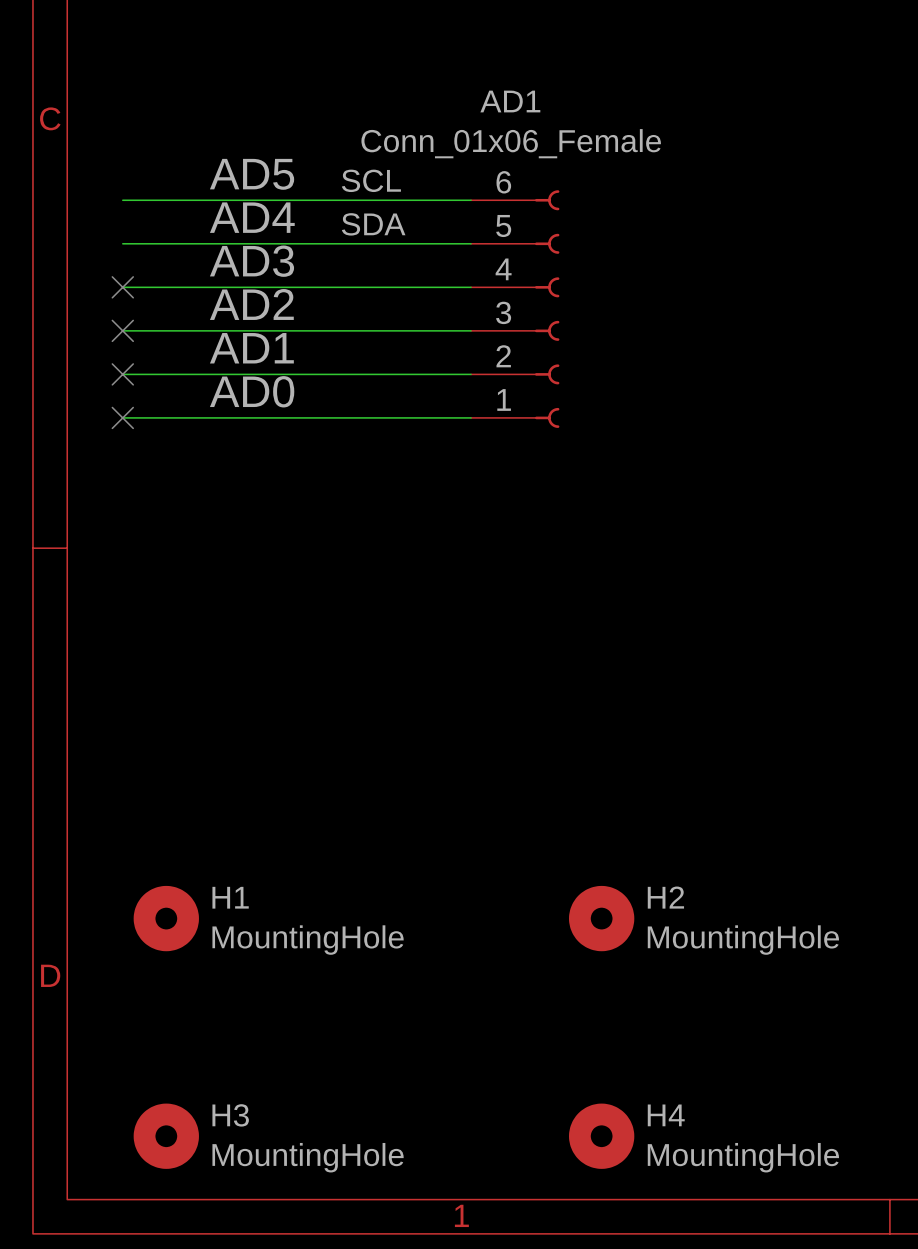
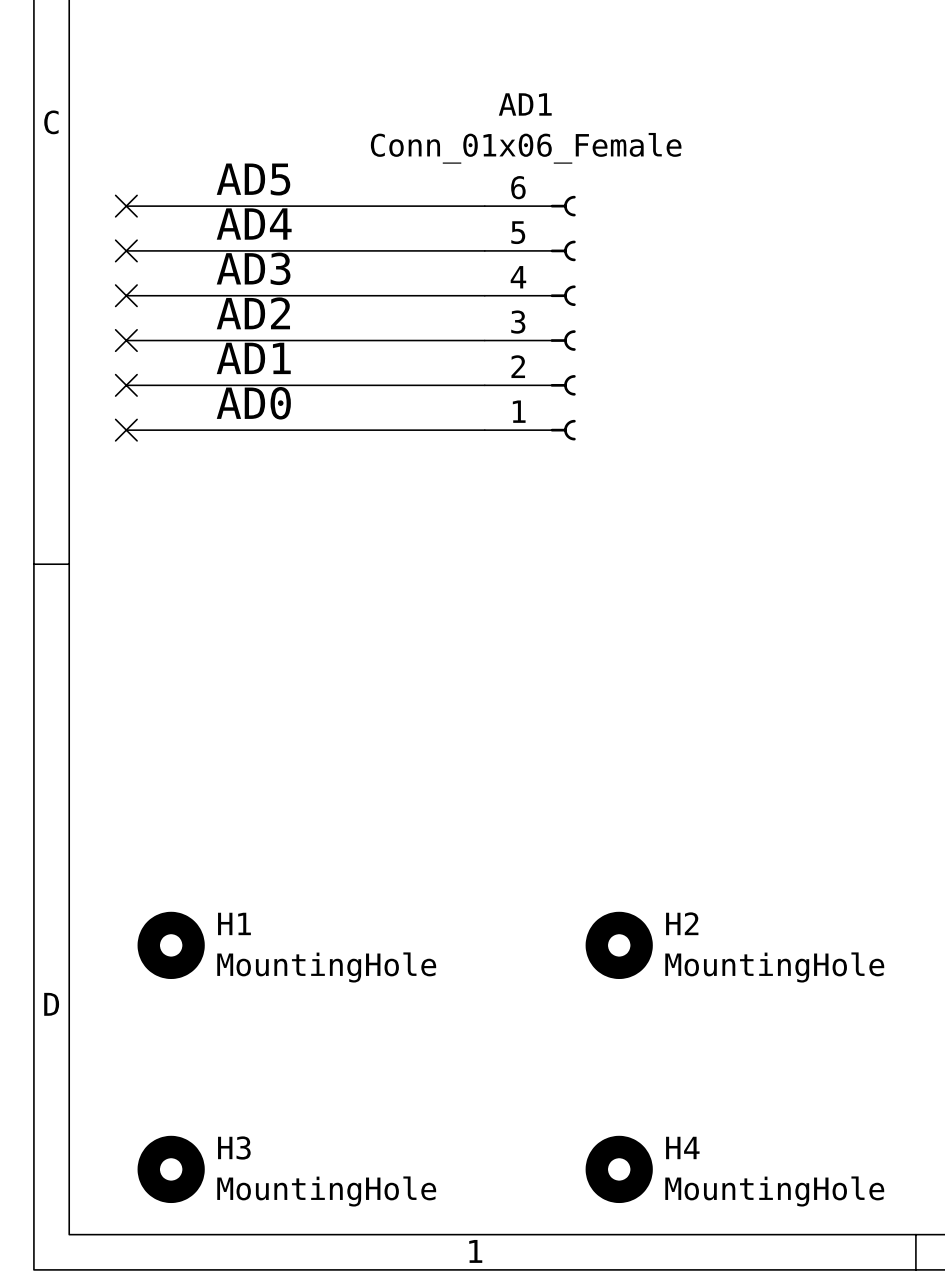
label: SCL (371, 180) -> none
no-connect mark: none -> (126, 206)
label: SDA (373, 224) -> none
no-connect mark: none -> (126, 250)

